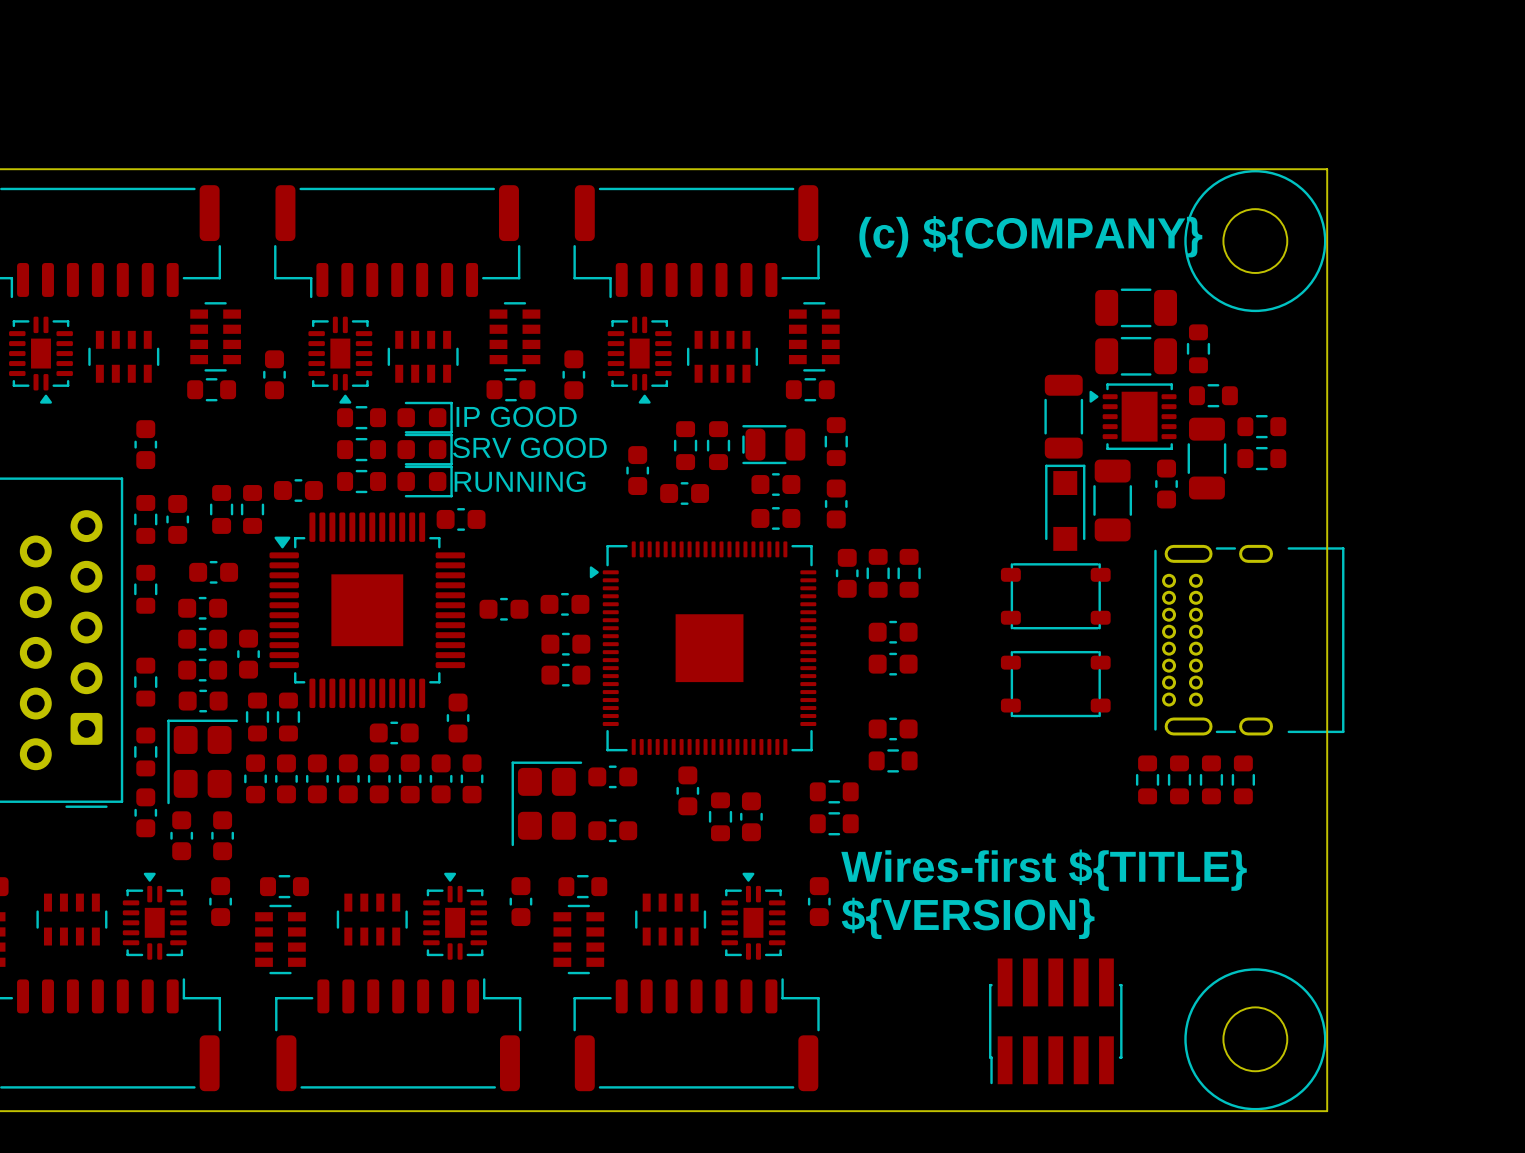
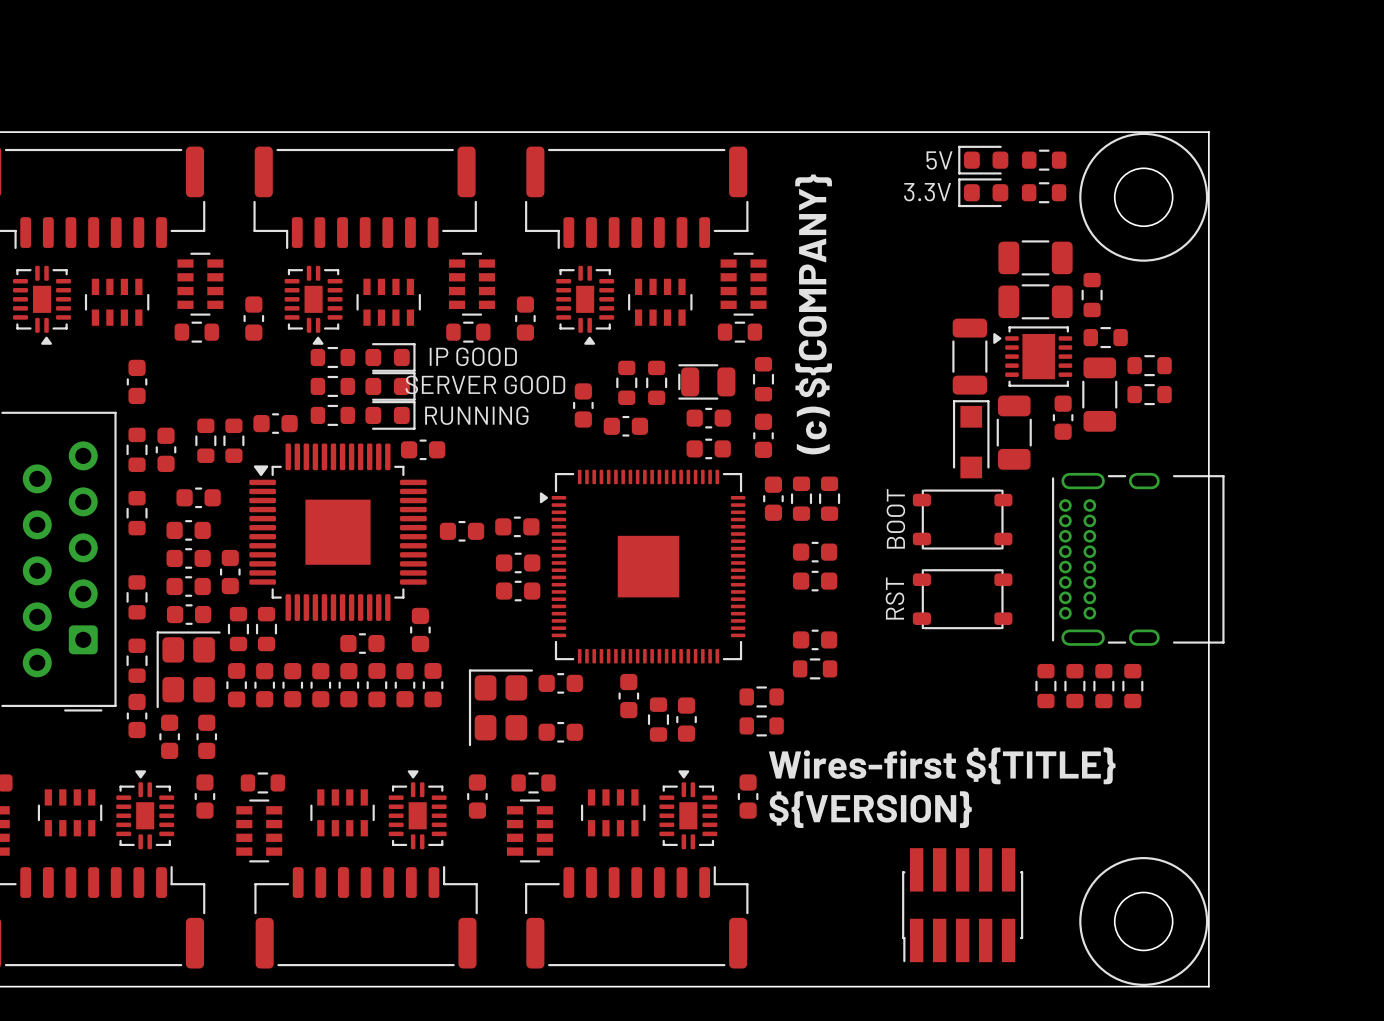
part: none -> 5V (983, 160)
part: none -> (1044, 160)
text rotation: 0° (1030, 236) -> 90° counterclockwise (813, 314)
part: none -> 3.3V (983, 192)
part: none -> (1044, 192)
part value: SRV GOOD (529, 447) -> SERVER GOOD (485, 384)
part value: none -> BOOT (895, 518)
part value: none -> RST (894, 598)

